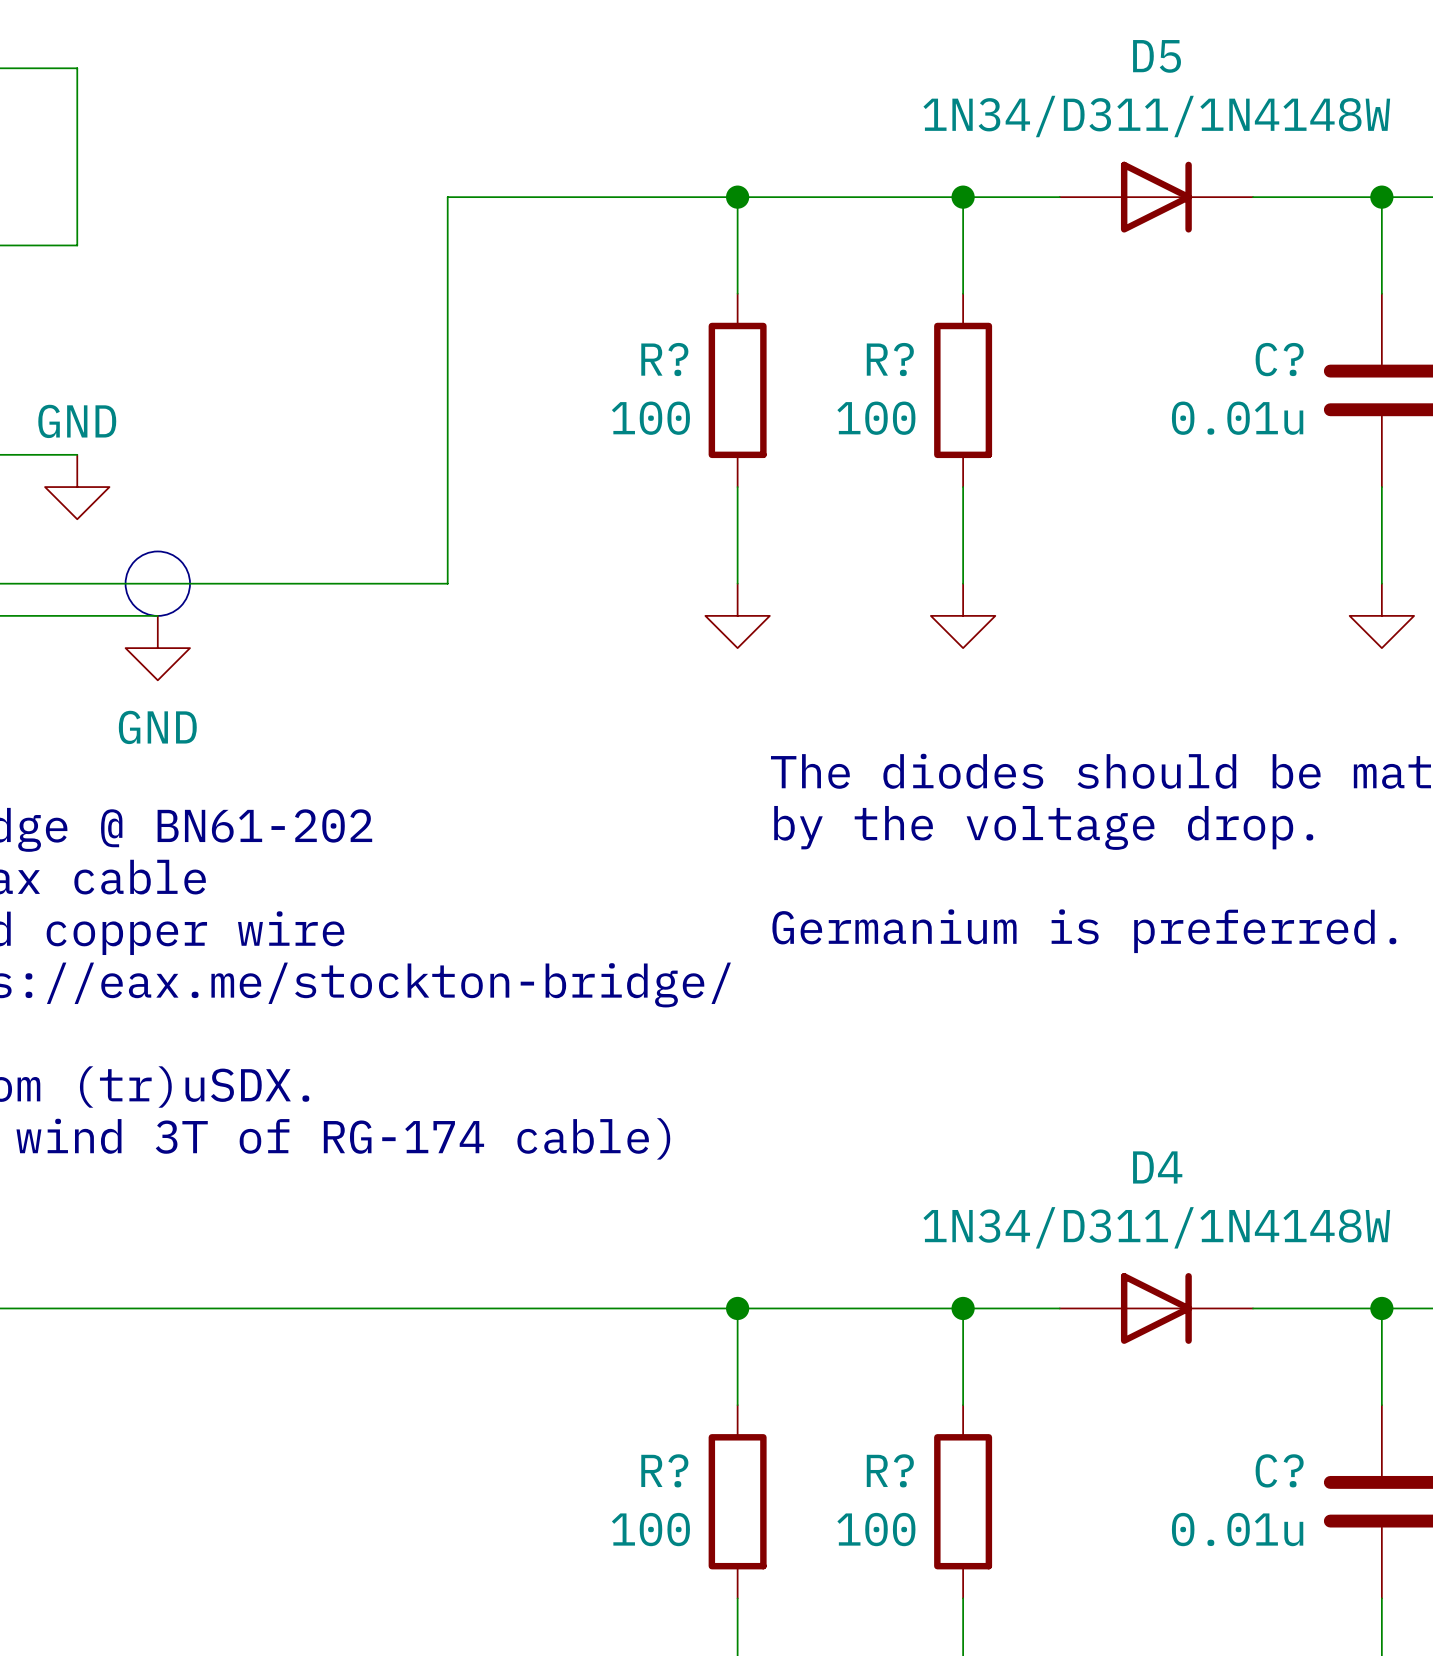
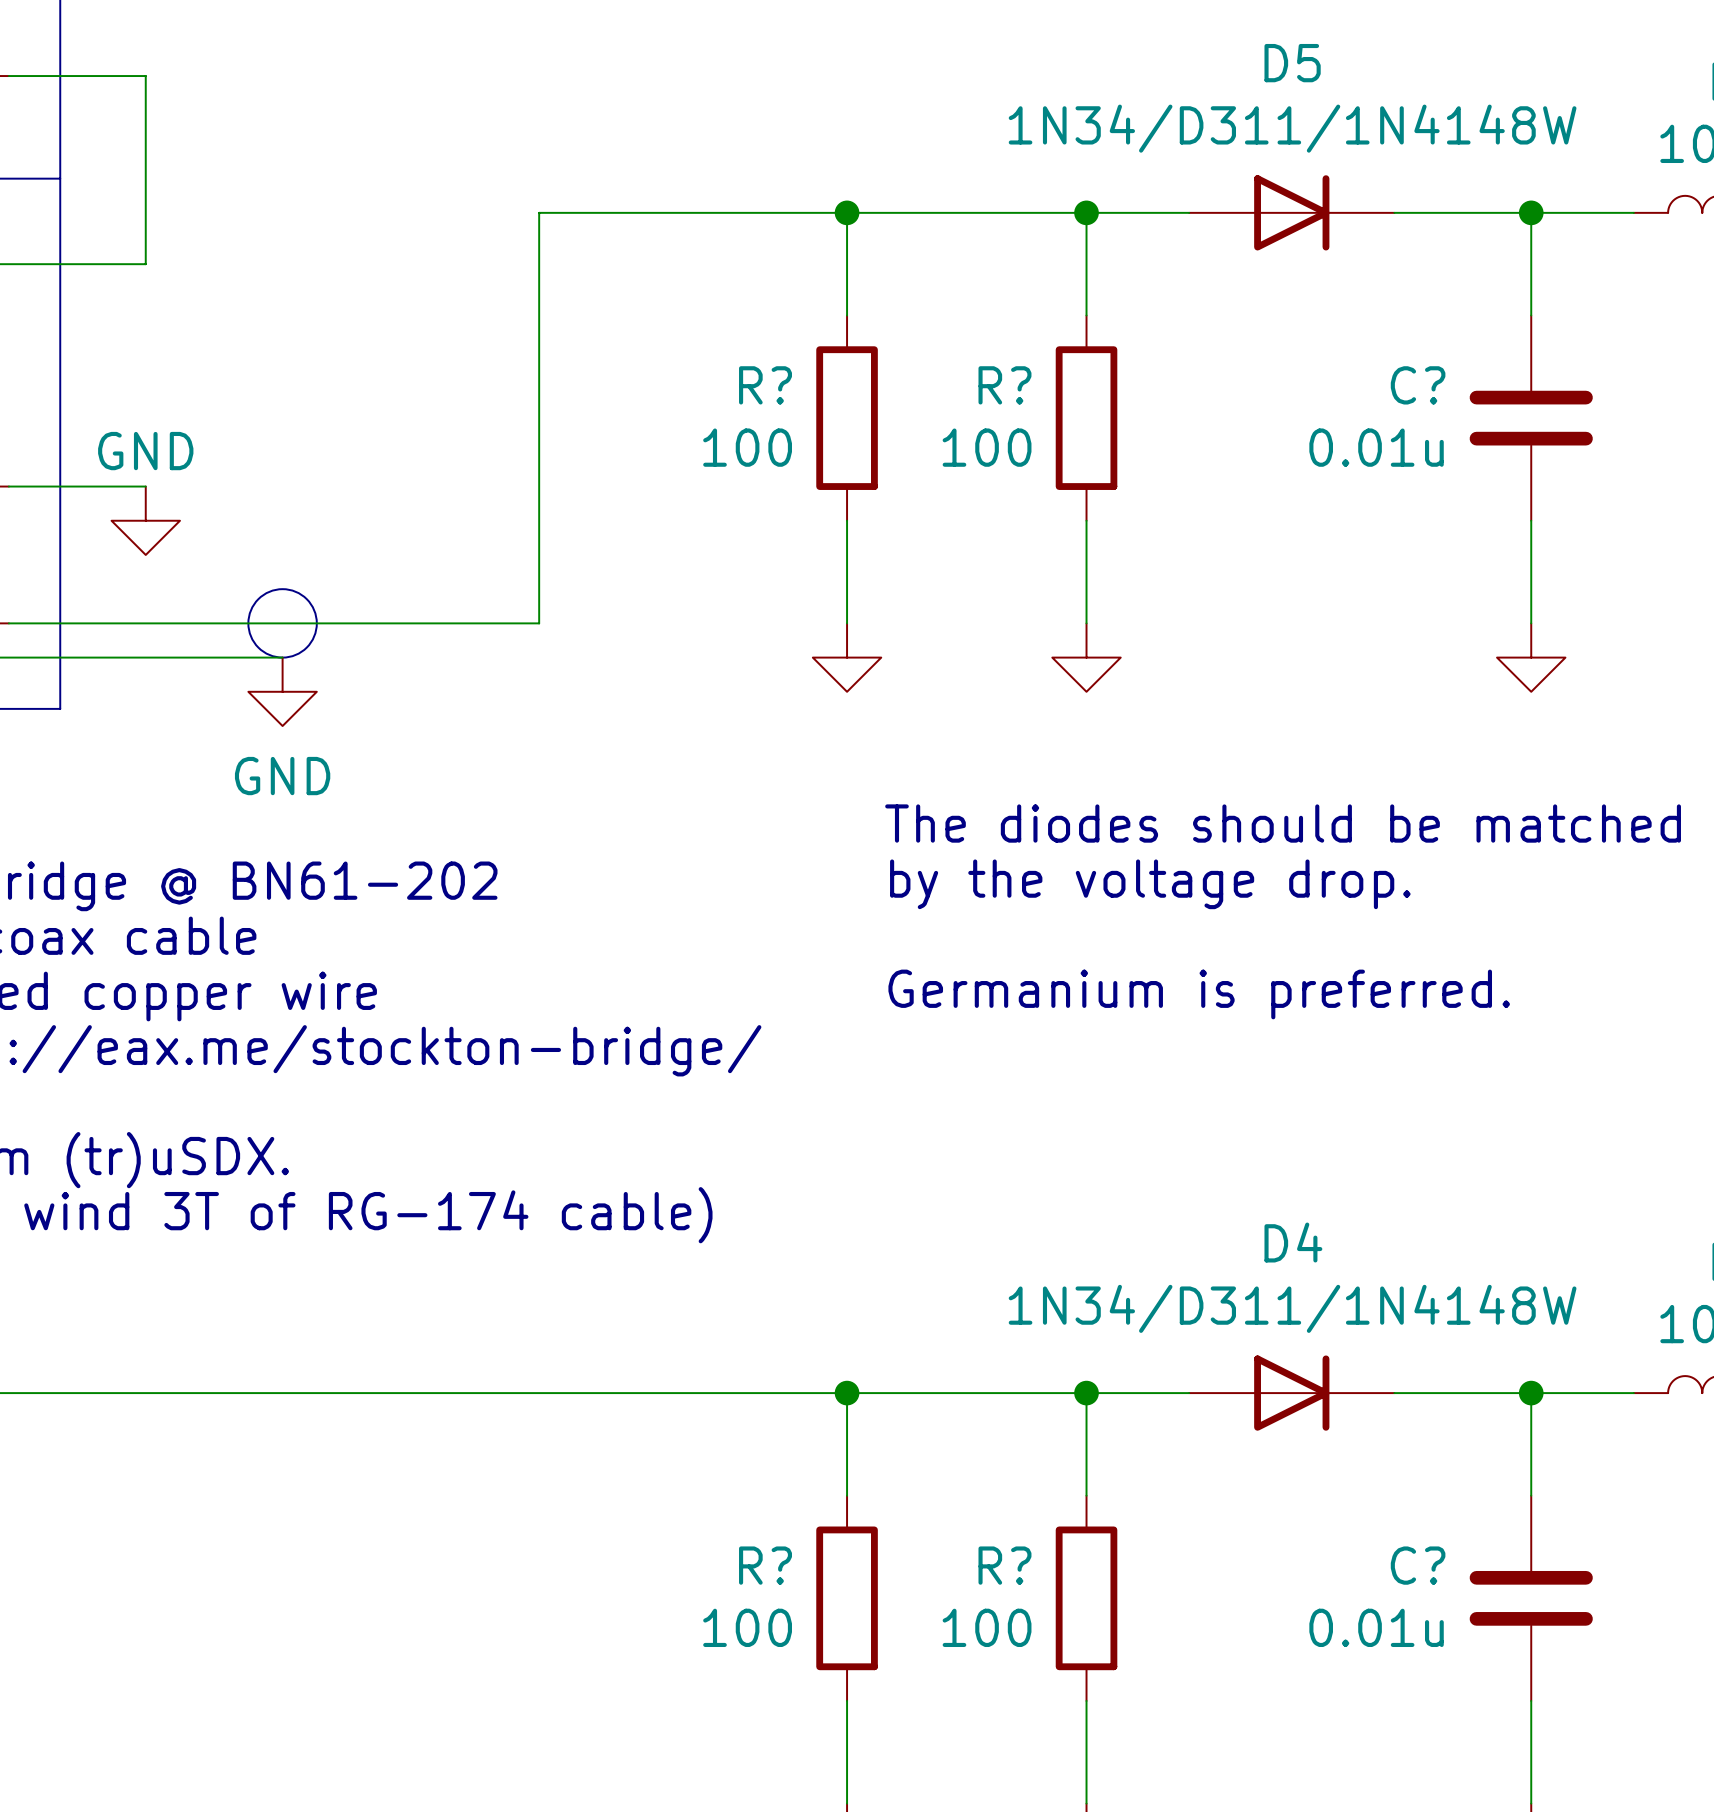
drawing position: (157, 583) -> (282, 623)
wire: none -> (231, 657) (282, 657)
power symbol position: GND (157, 648) -> GND (282, 691)

